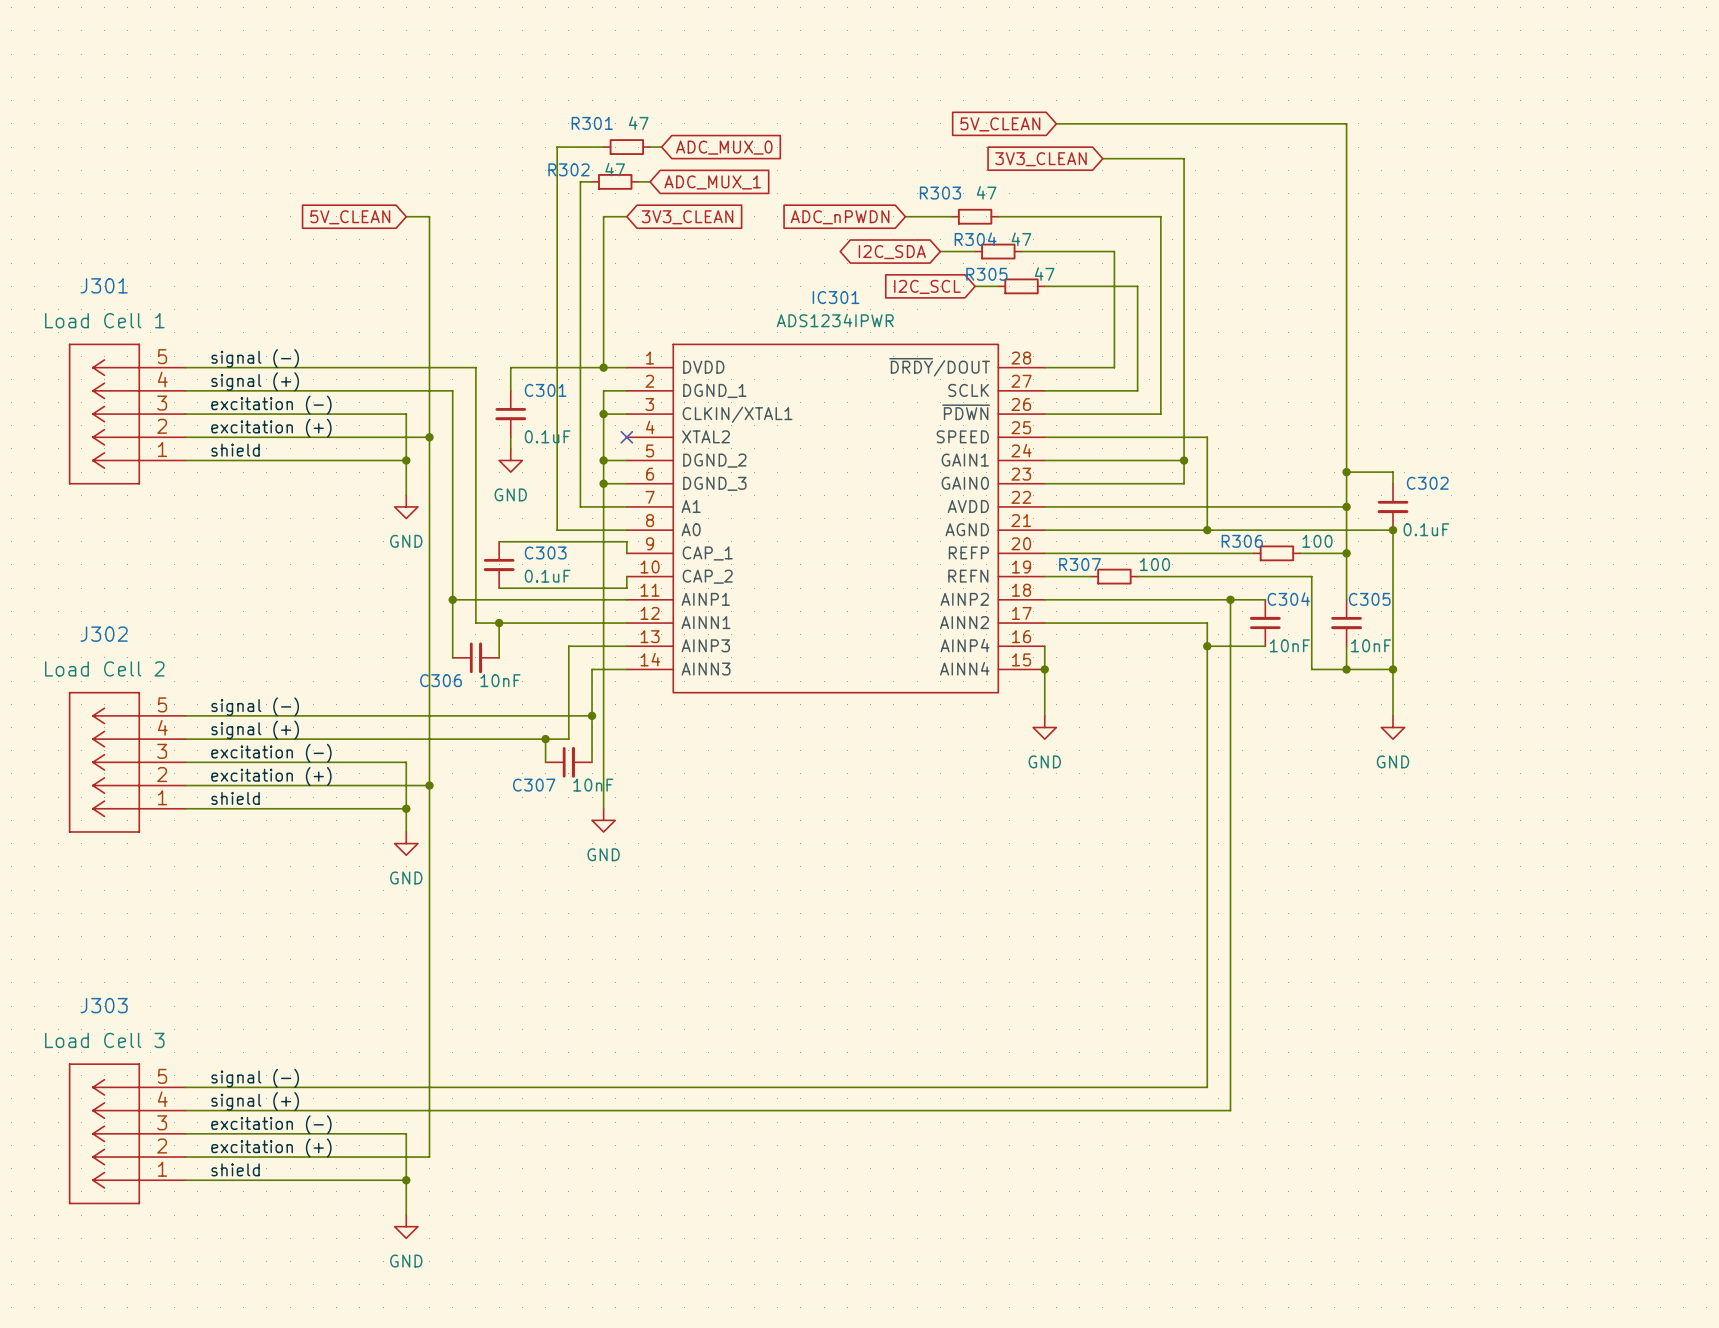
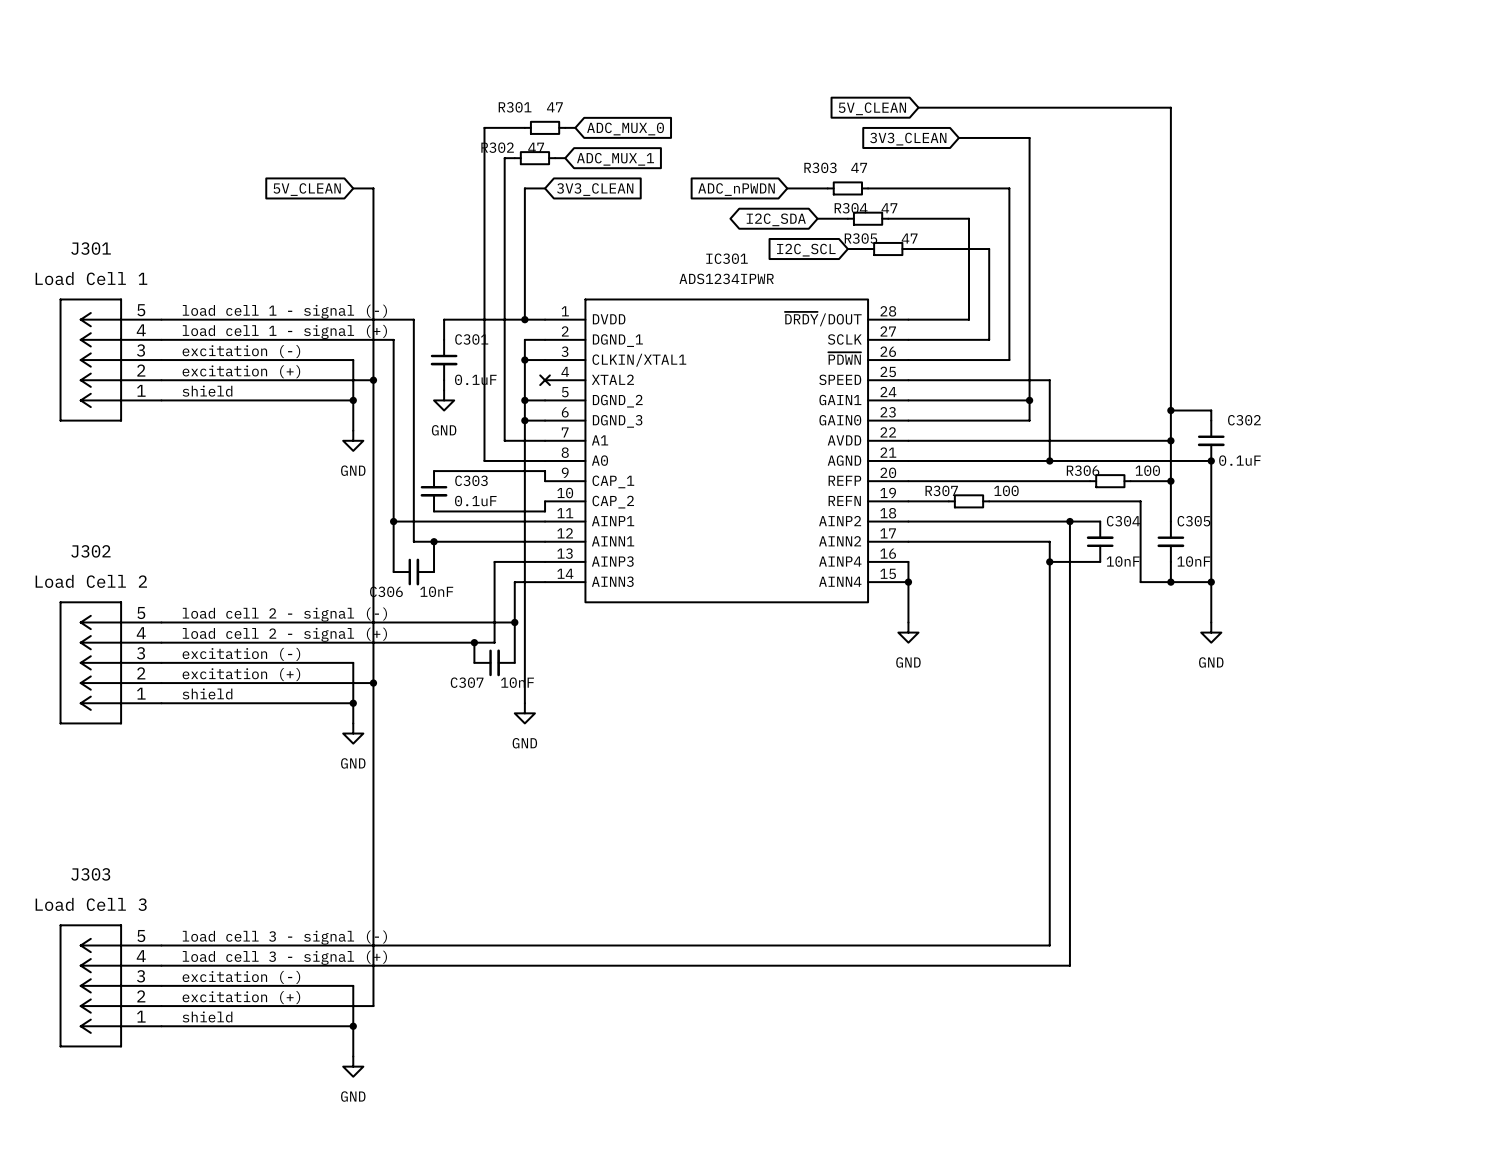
label: signal (-) (255, 358) -> load cell 1 - signal (-) (284, 311)
label: signal (+) (255, 381) -> load cell 1 - signal (+) (284, 331)
label: signal (-) (255, 706) -> load cell 2 - signal (-) (284, 614)
label: signal (+) (255, 730) -> load cell 2 - signal (+) (284, 634)
label: signal (-) (255, 1078) -> load cell 3 - signal (-) (284, 937)
label: signal (+) (255, 1101) -> load cell 3 - signal (+) (284, 957)

